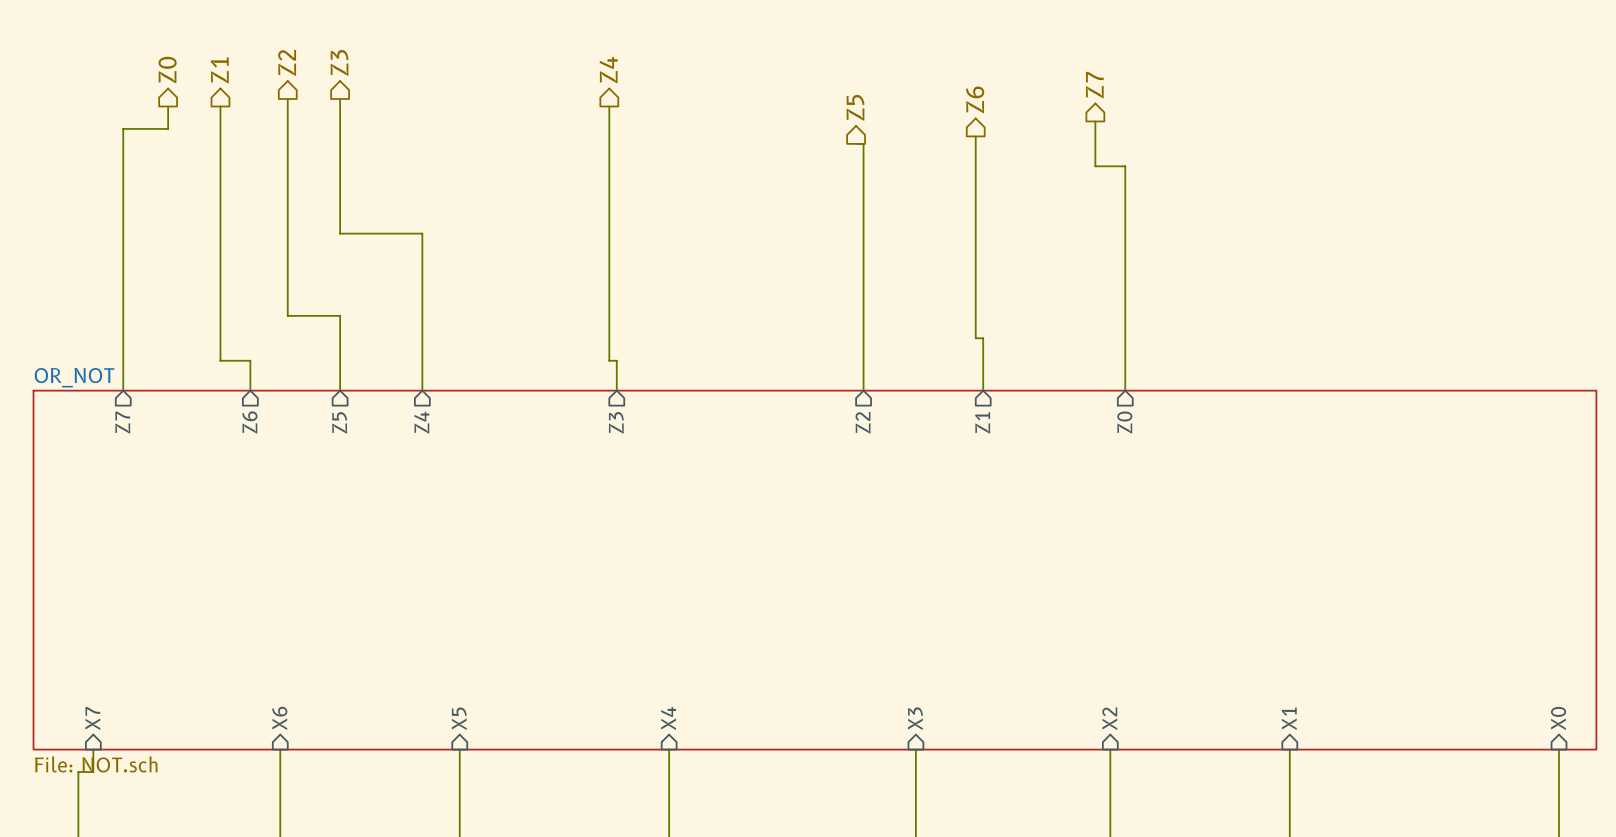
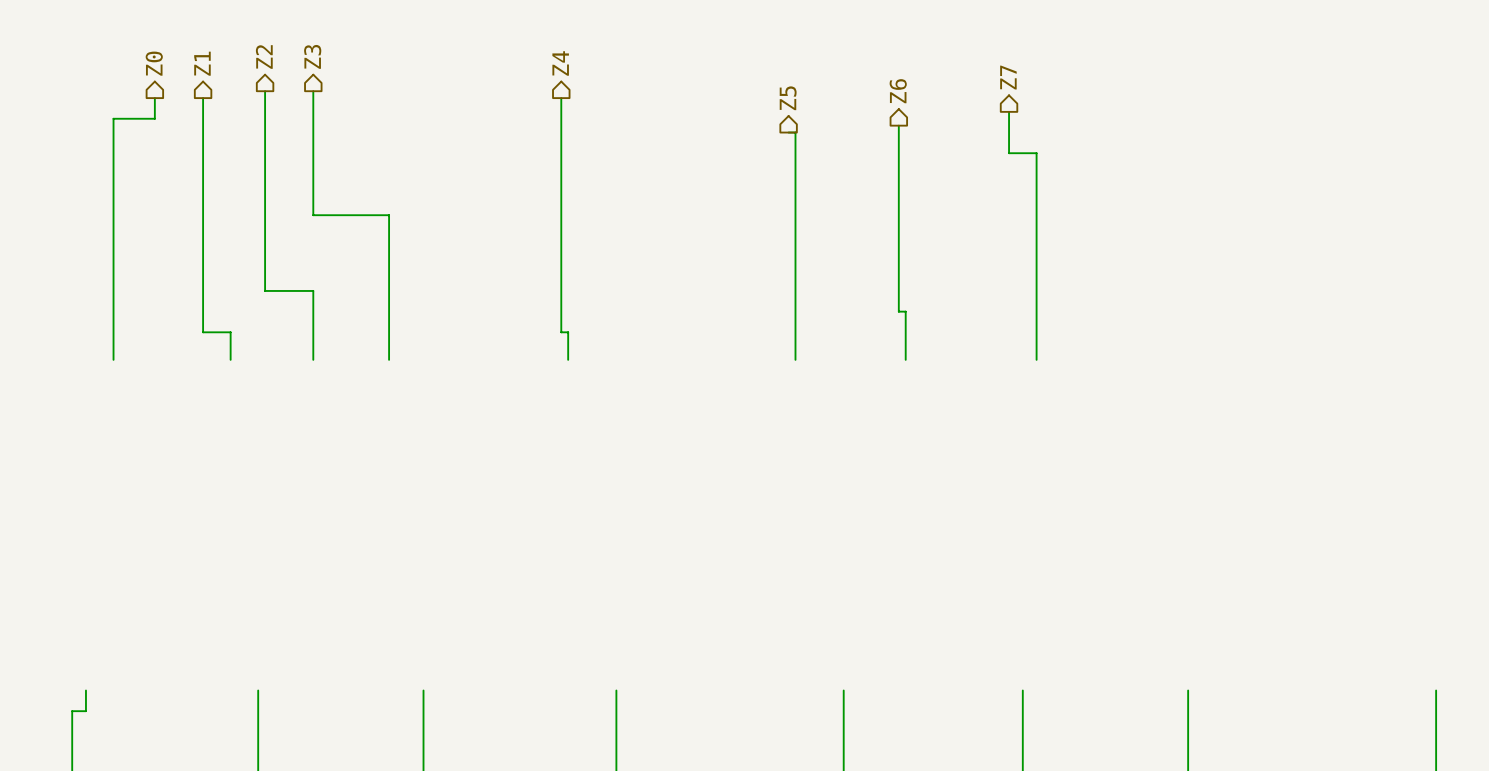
sheet pin: Z7 (122, 422) -> none
sheet pin: Z6 (249, 422) -> none
sheet pin: Z5 (339, 422) -> none
sheet pin: Z4 (421, 422) -> none
sheet pin: Z3 (616, 422) -> none
sheet pin: Z2 (863, 422) -> none
sheet pin: Z1 (982, 422) -> none
sheet pin: Z0 (1124, 422) -> none
sheet OR_NOT: File: NOT.sch (814, 570) -> none
sheet pin: X7 (92, 718) -> none
sheet pin: X6 (279, 718) -> none
sheet pin: X5 (459, 718) -> none
sheet pin: X4 (668, 718) -> none
sheet pin: X3 (915, 718) -> none
sheet pin: X2 (1109, 718) -> none
sheet pin: X1 (1289, 718) -> none
sheet pin: X0 (1558, 718) -> none

